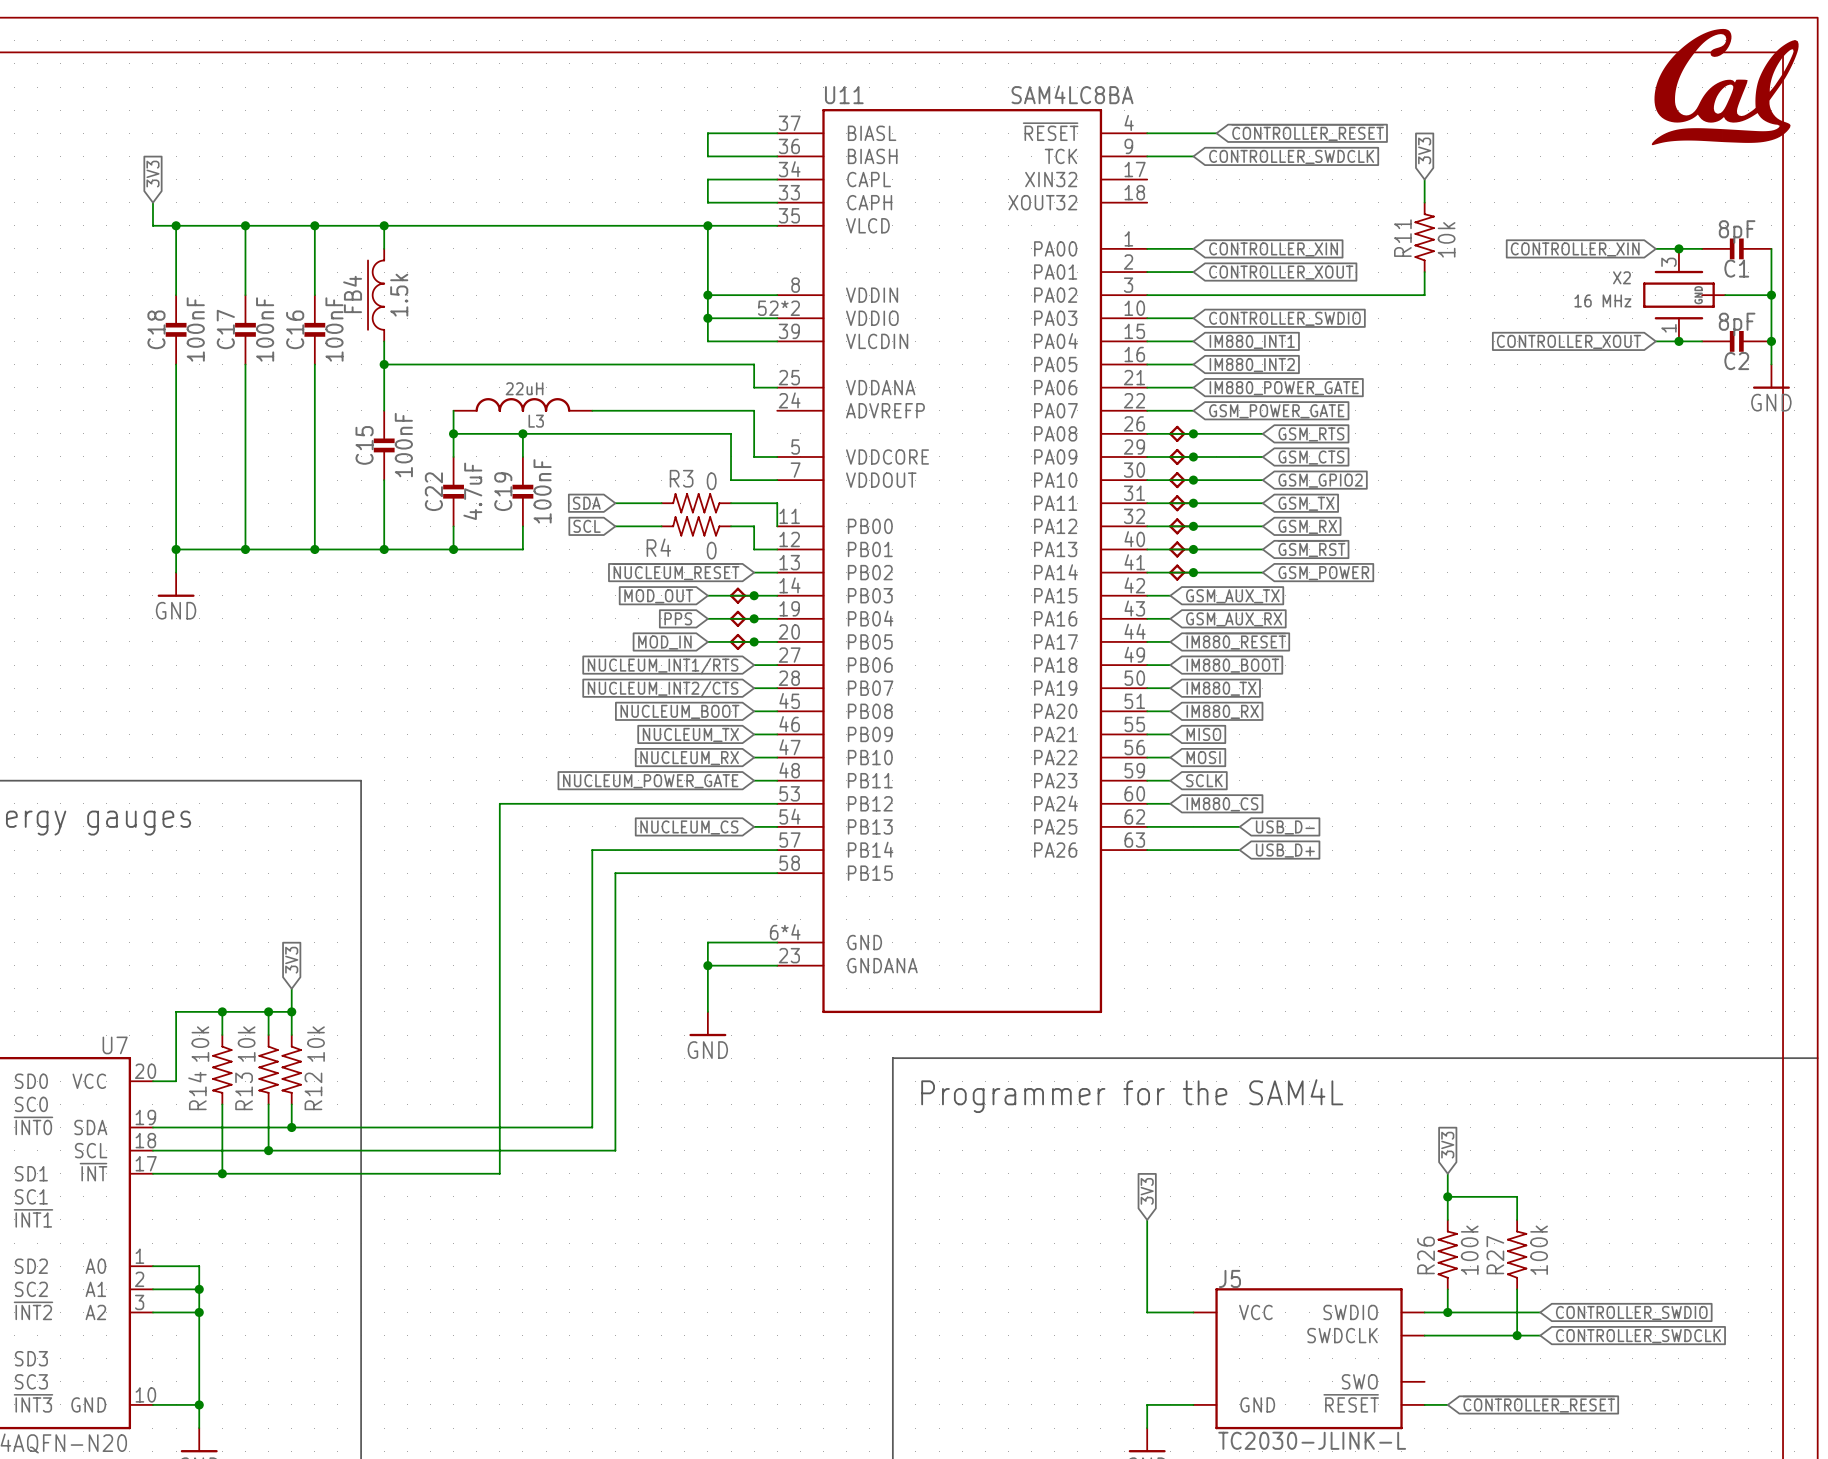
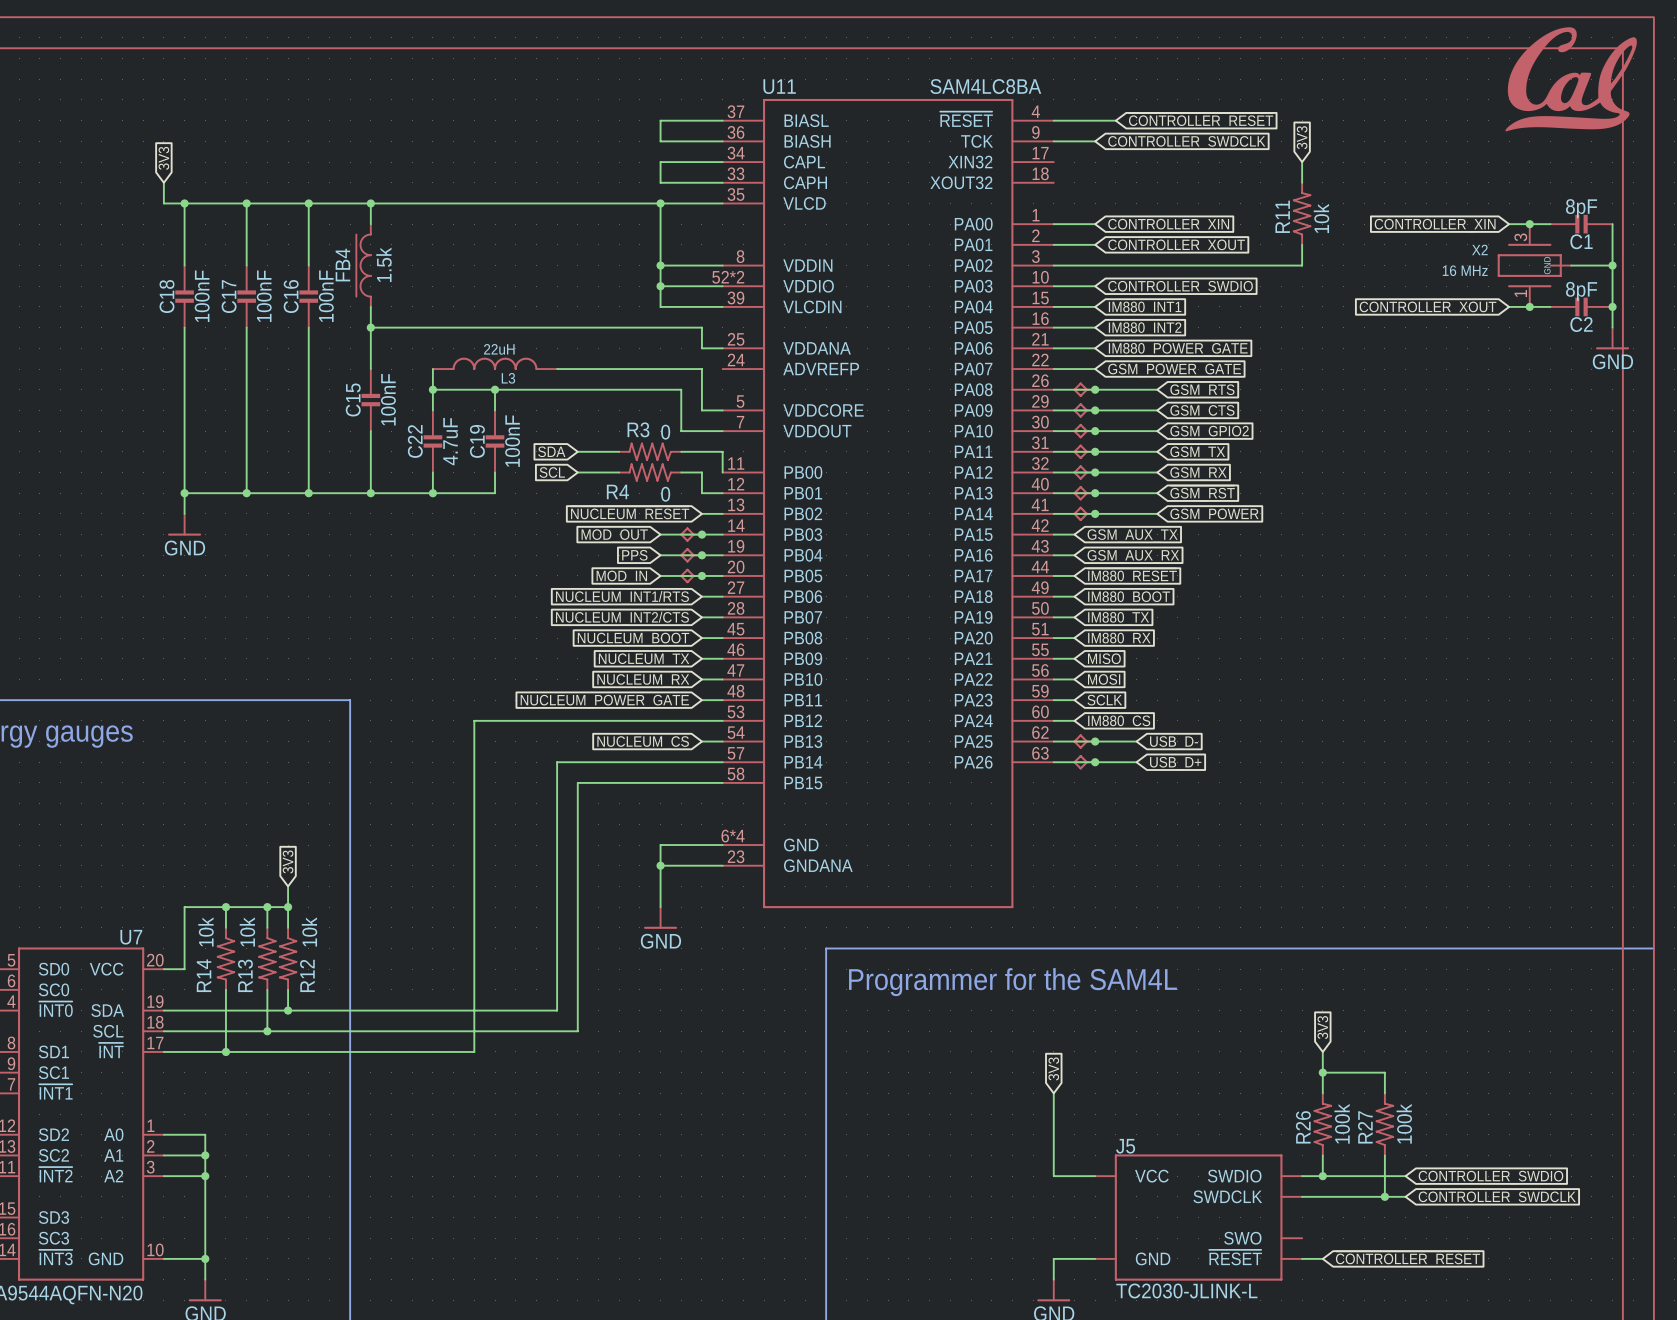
part: none -> (1084, 741)
junction: none -> (1095, 741)
part: none -> (1084, 762)
junction: none -> (1095, 762)

